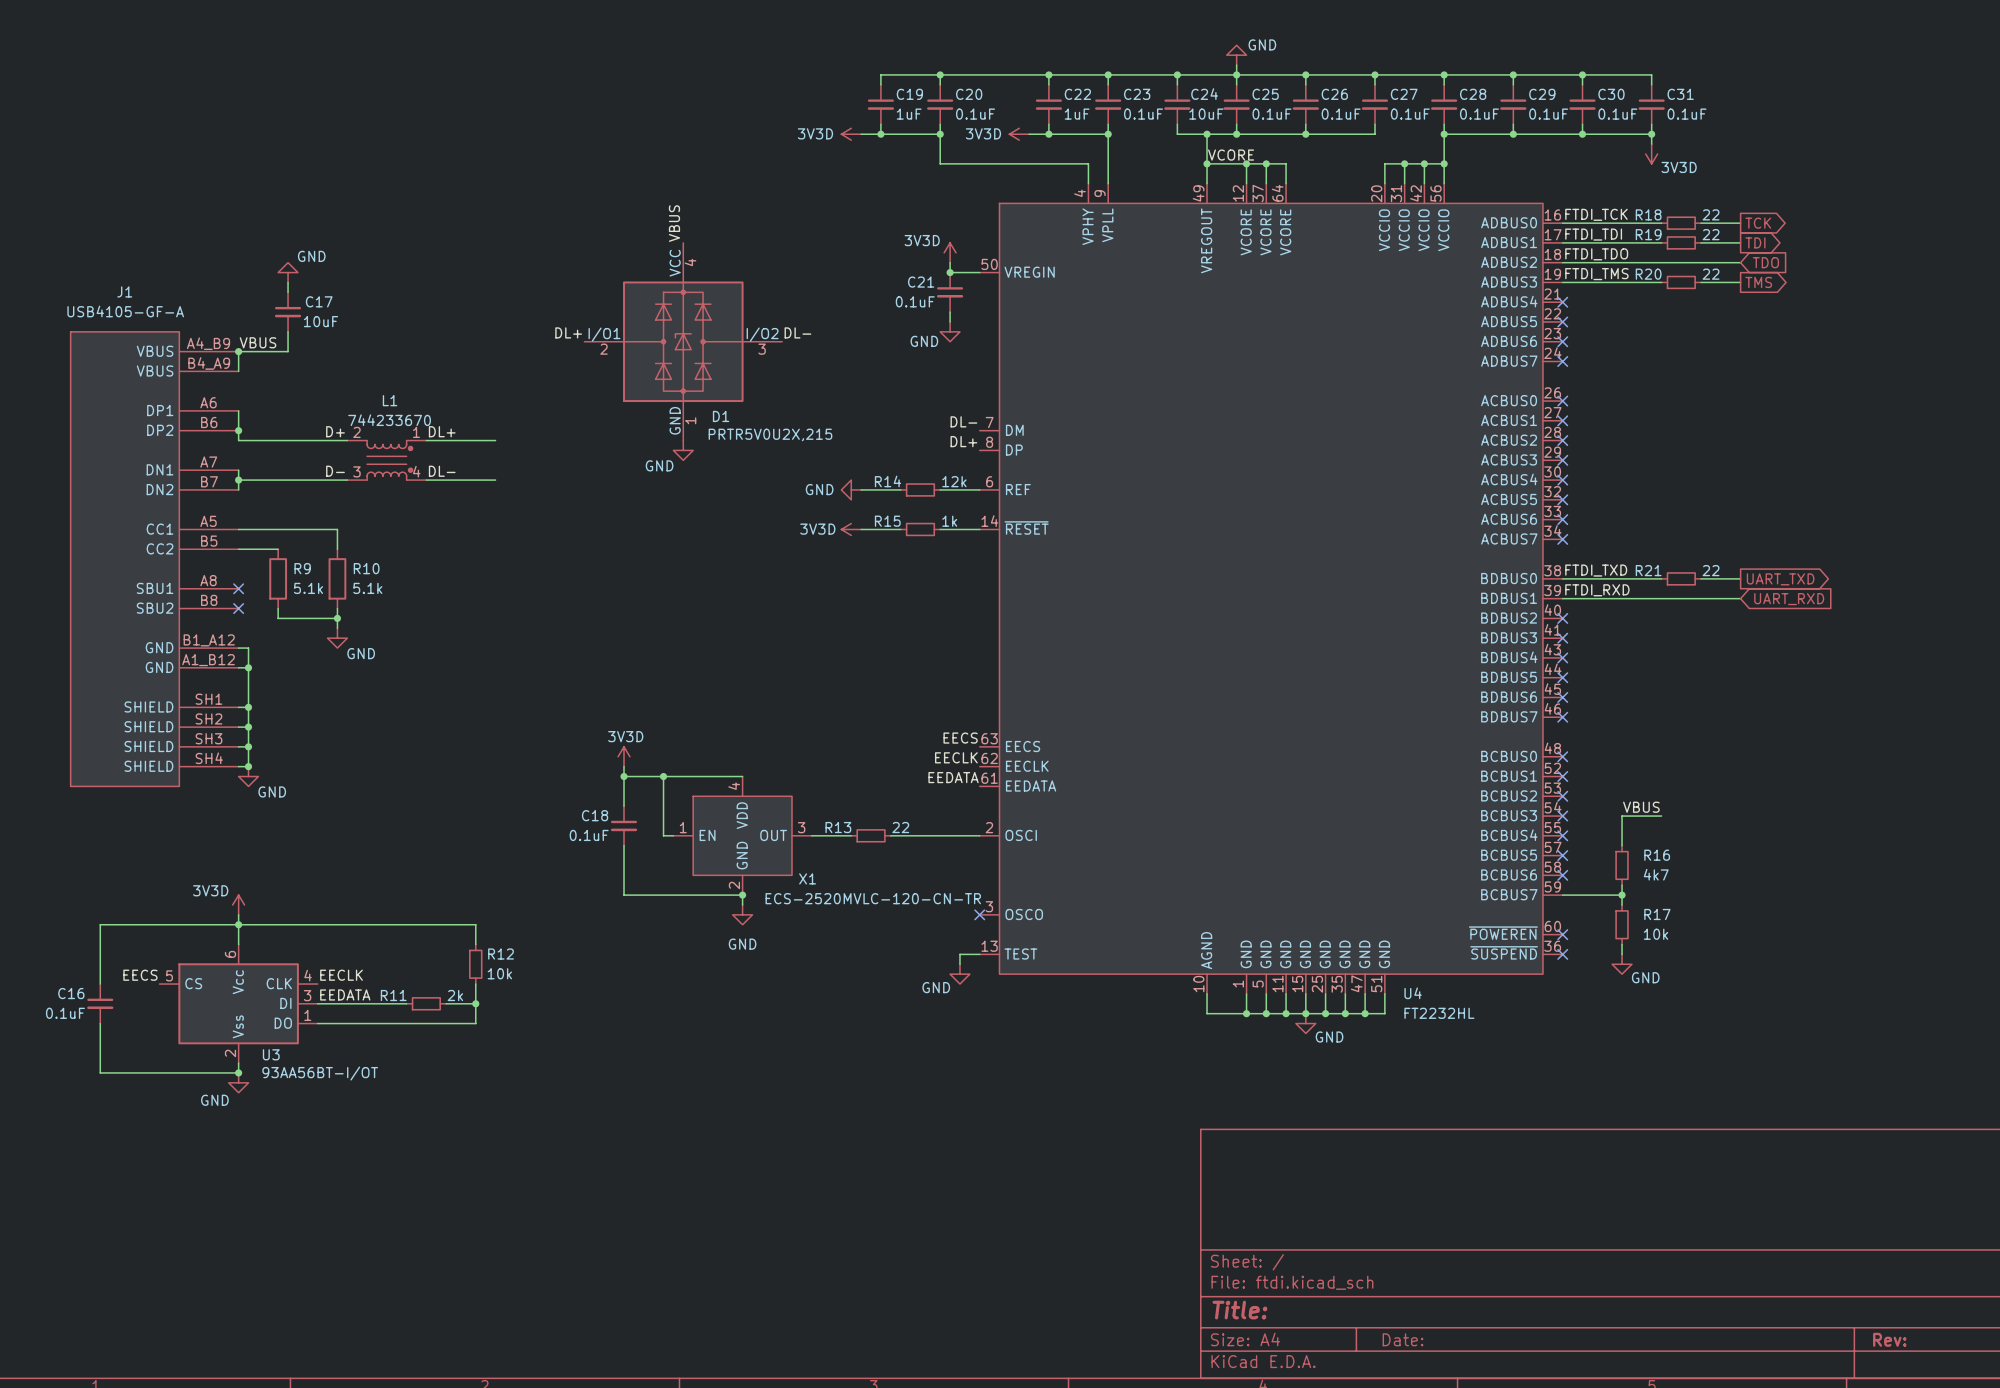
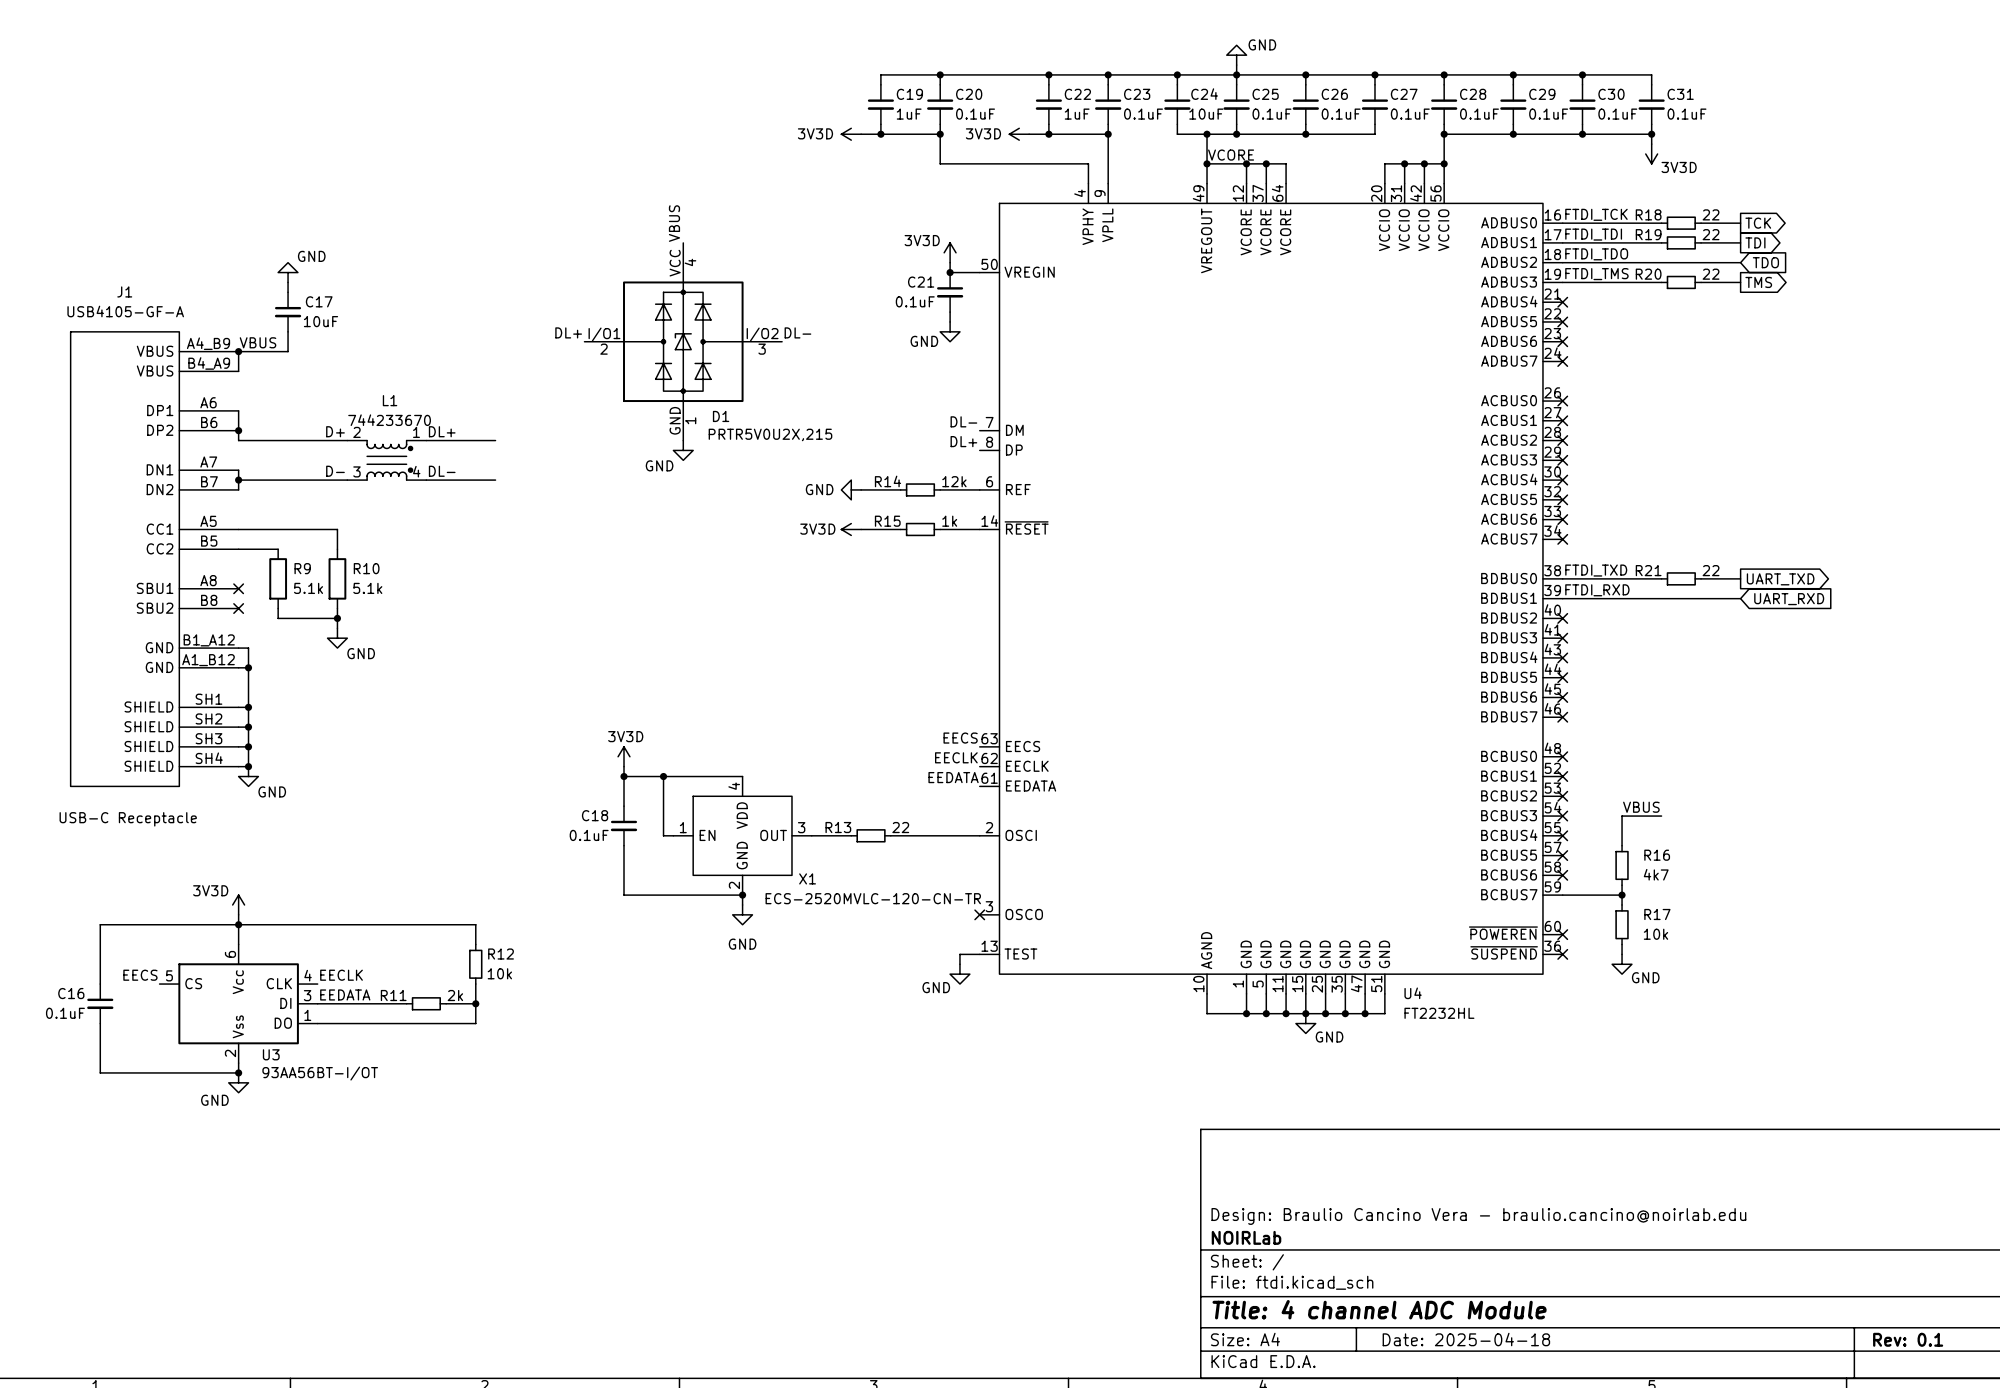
text: none -> USB-C Receptacle (128, 819)
title block: none -> Design: Braulio Cancino Vera - braulio.cancino@noirlab.edu (1478, 1216)
title block: none -> NOIRLab (1246, 1237)
title block: Title: (1239, 1310) -> Title: 4 channel ADC Module (1379, 1309)
title block: Date: (1403, 1339) -> Date: 2025-04-18 (1466, 1339)
title block: Rev: (1889, 1339) -> Rev: 0.1 (1908, 1339)

